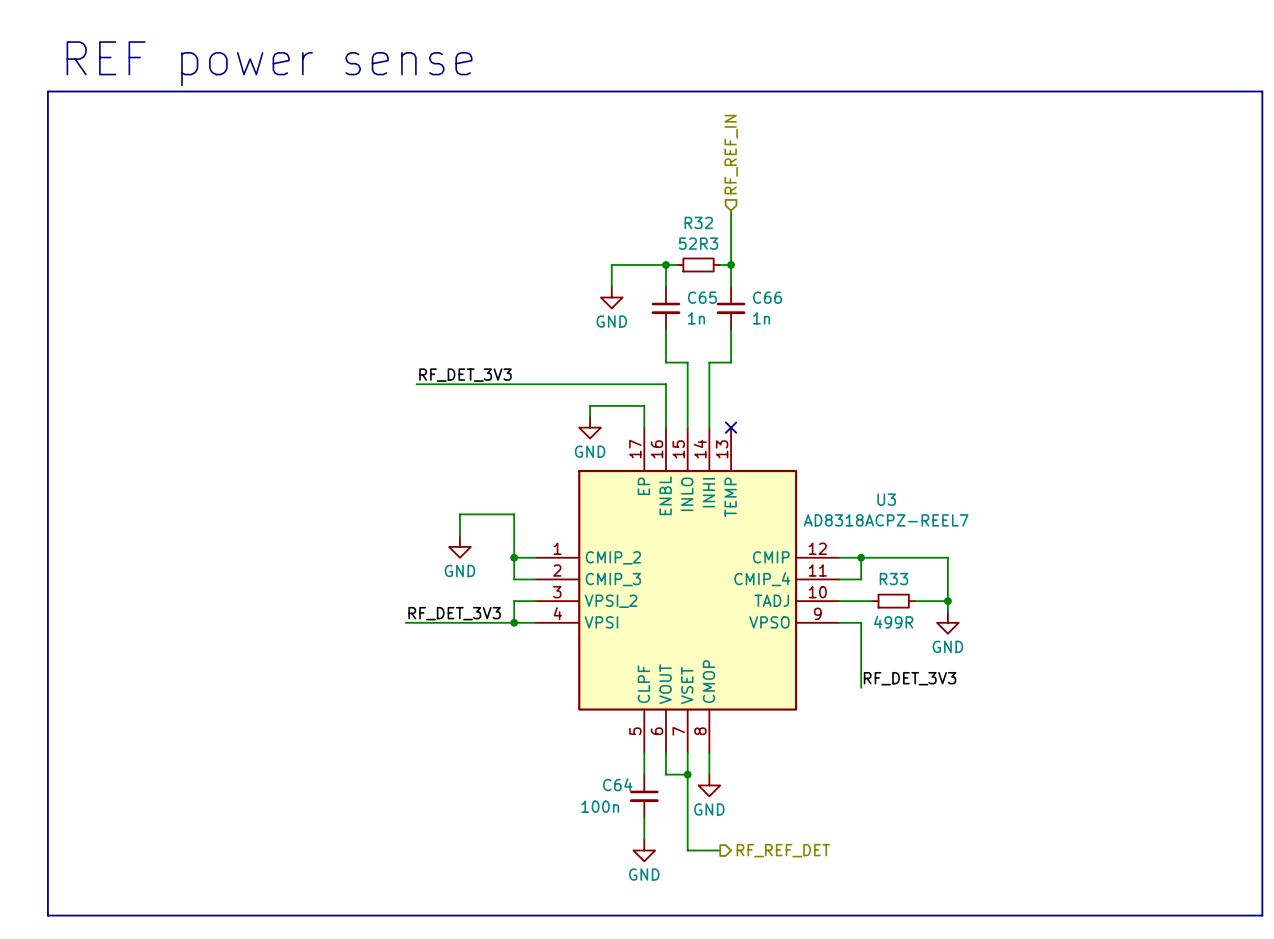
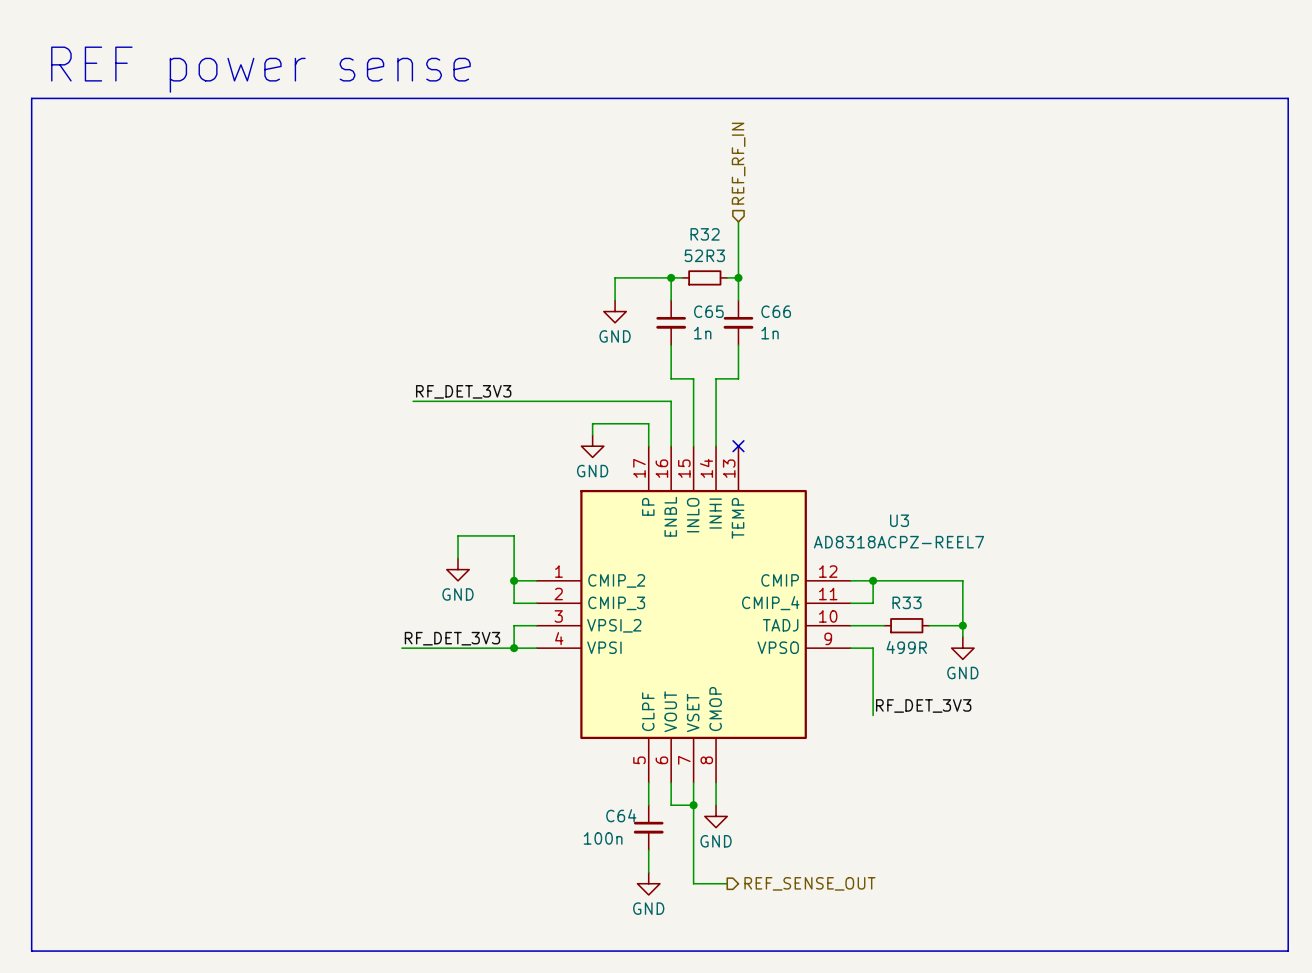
hierarchical label: RF_REF_IN (731, 154) -> REF_RF_IN (738, 163)
hierarchical label: RF_REF_DET (783, 850) -> REF_SENSE_OUT (809, 883)

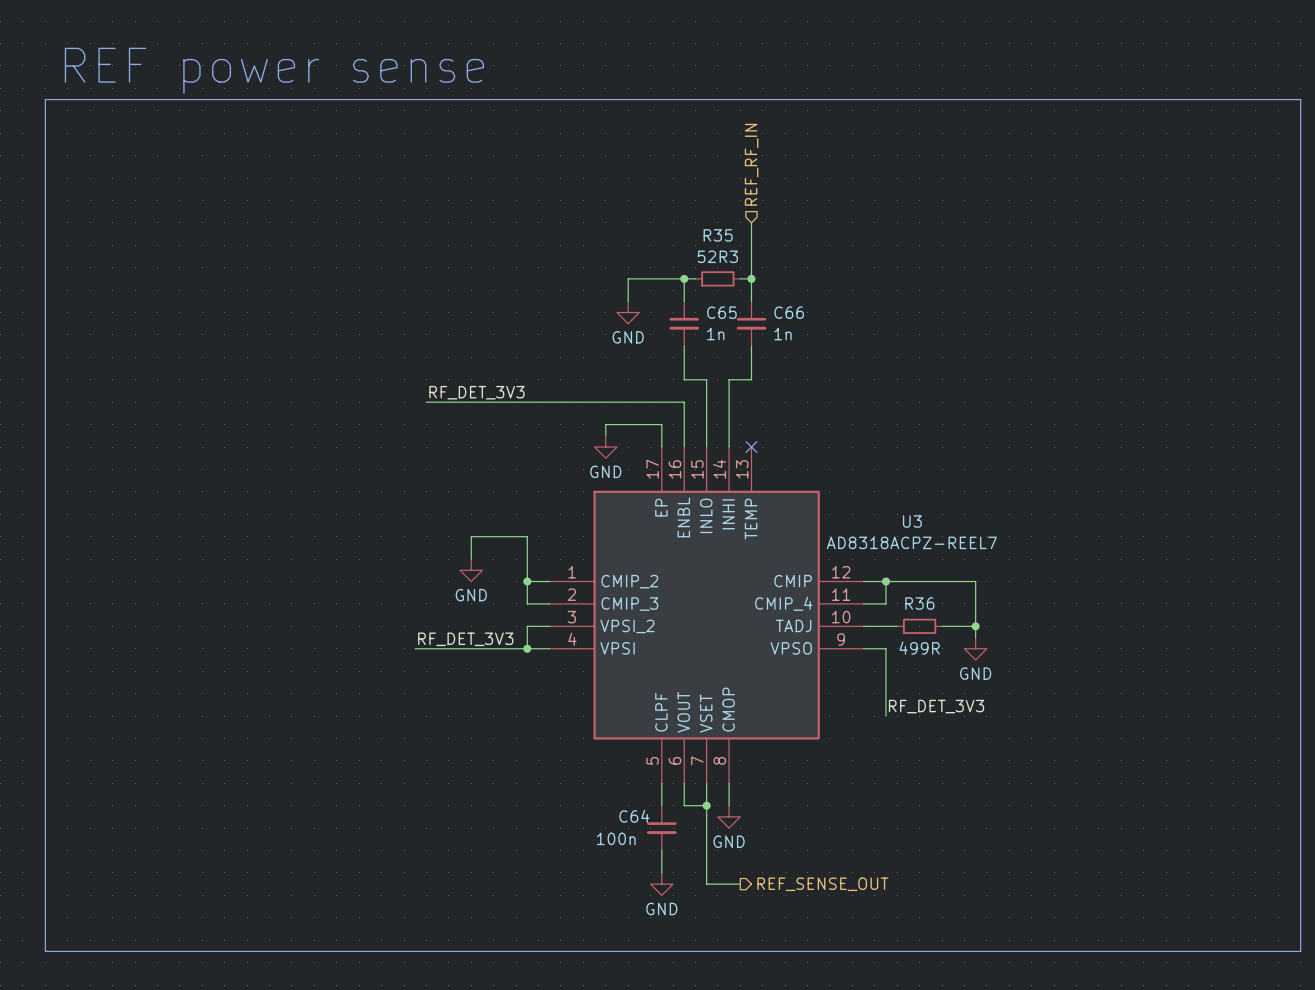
R32 name: R32 (705, 234) -> R35 (718, 235)
R33 name: R33 (907, 602) -> R36 (919, 603)

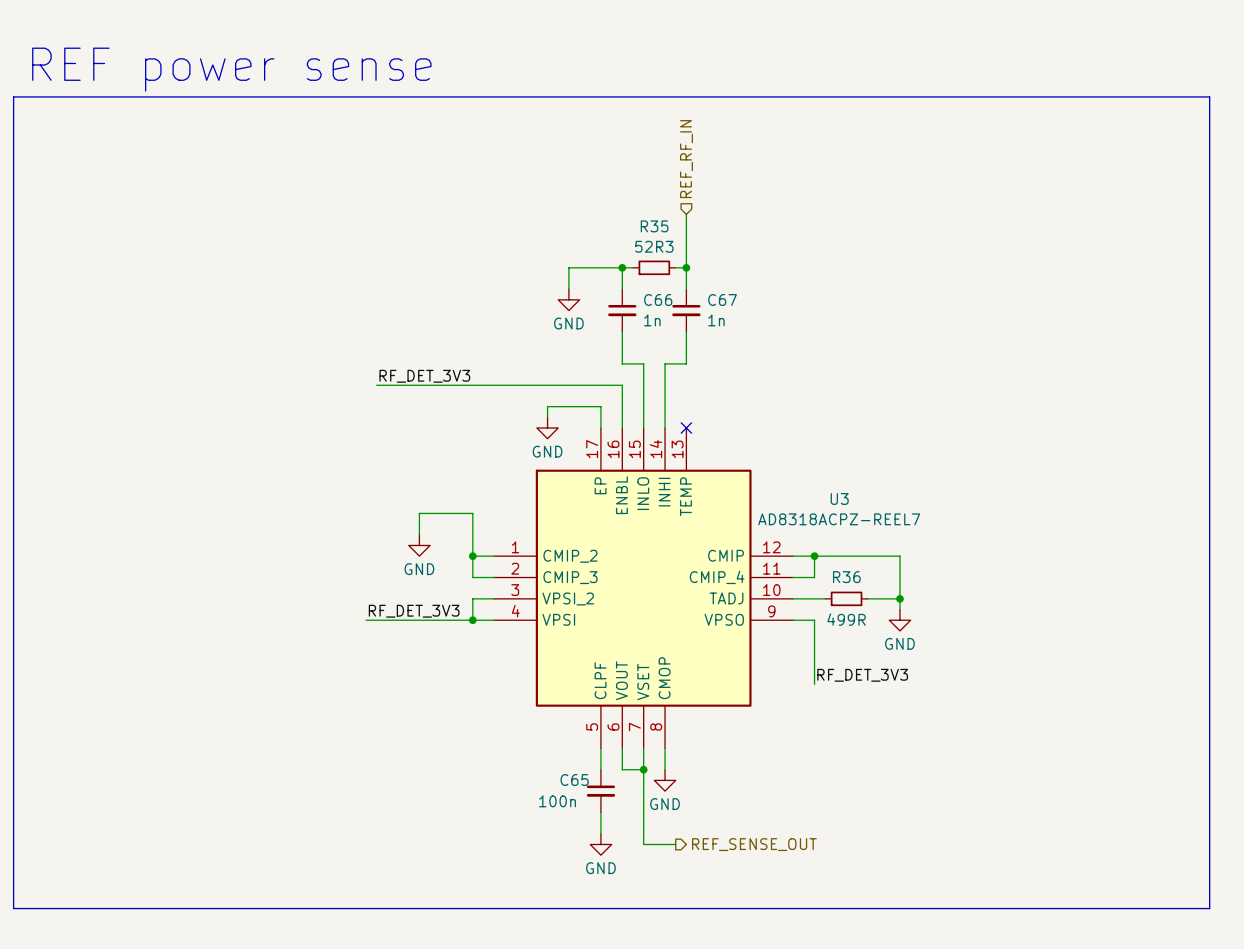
C65 name: C65 (721, 312) -> C66 (658, 300)
C66 name: C66 (789, 312) -> C67 (722, 300)
C64 name: C64 (634, 816) -> C65 (574, 780)

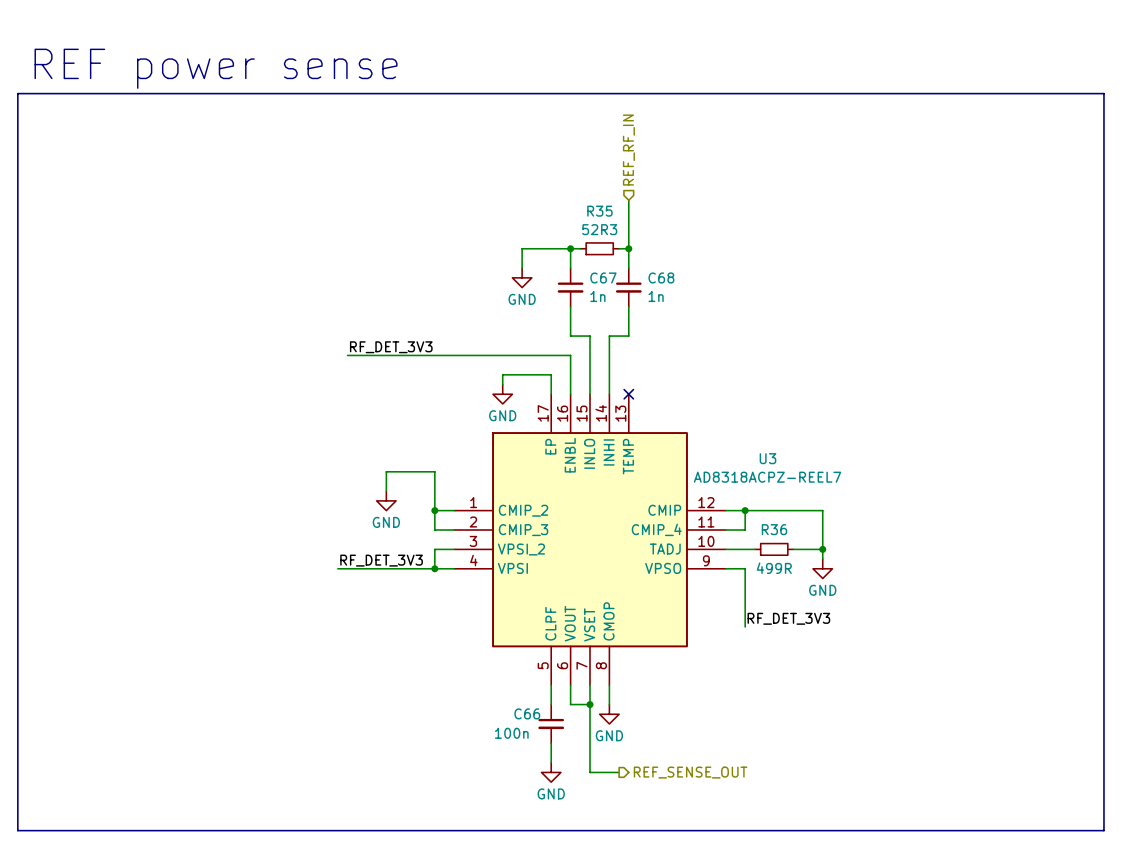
C66 name: C66 (658, 300) -> C67 (603, 277)
C67 name: C67 (722, 300) -> C68 (661, 277)
C65 name: C65 (574, 780) -> C66 (527, 713)

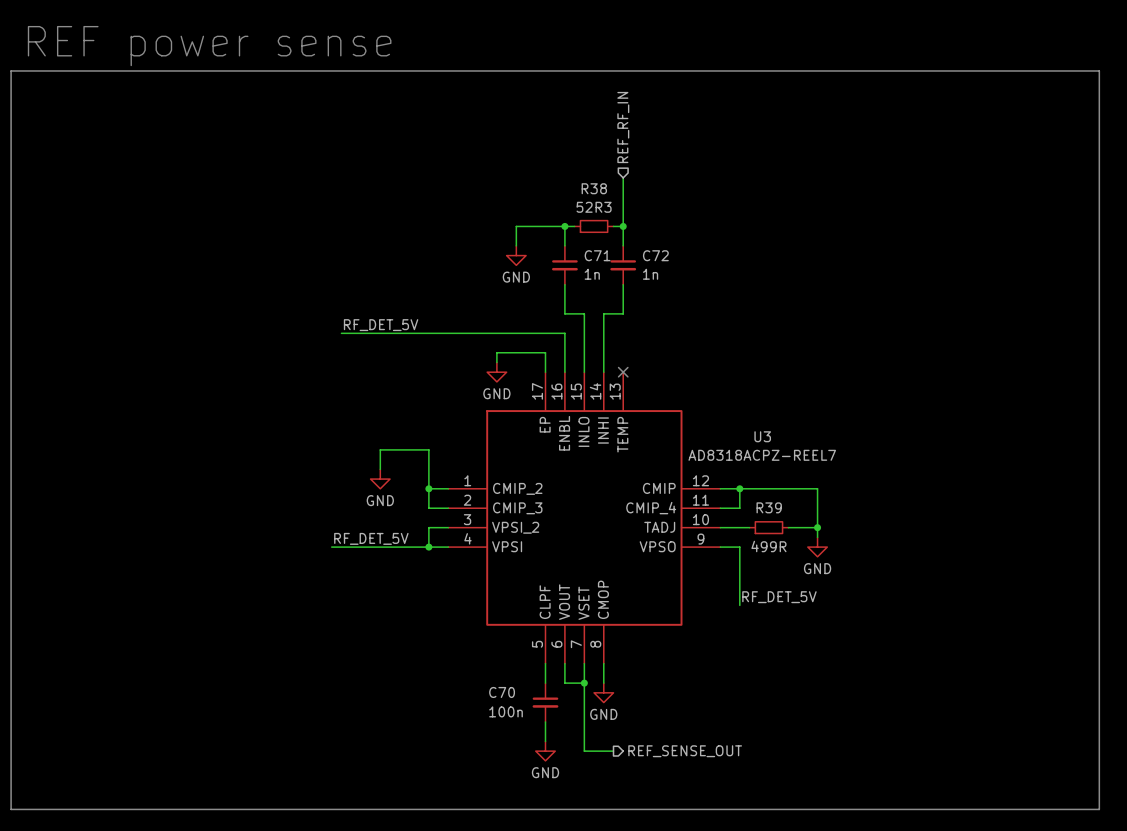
R35 name: R35 (599, 211) -> R38 (594, 188)
C67 name: C67 (603, 277) -> C71 (597, 255)
C68 name: C68 (661, 277) -> C72 (655, 255)
label: RF_DET_3V3 (391, 347) -> RF_DET_5V (381, 325)
R36 name: R36 (774, 529) -> R39 (769, 507)
label: RF_DET_3V3 (381, 560) -> RF_DET_5V (371, 538)
label: RF_DET_3V3 (788, 618) -> RF_DET_5V (779, 597)
C66 name: C66 (527, 713) -> C70 (502, 692)

